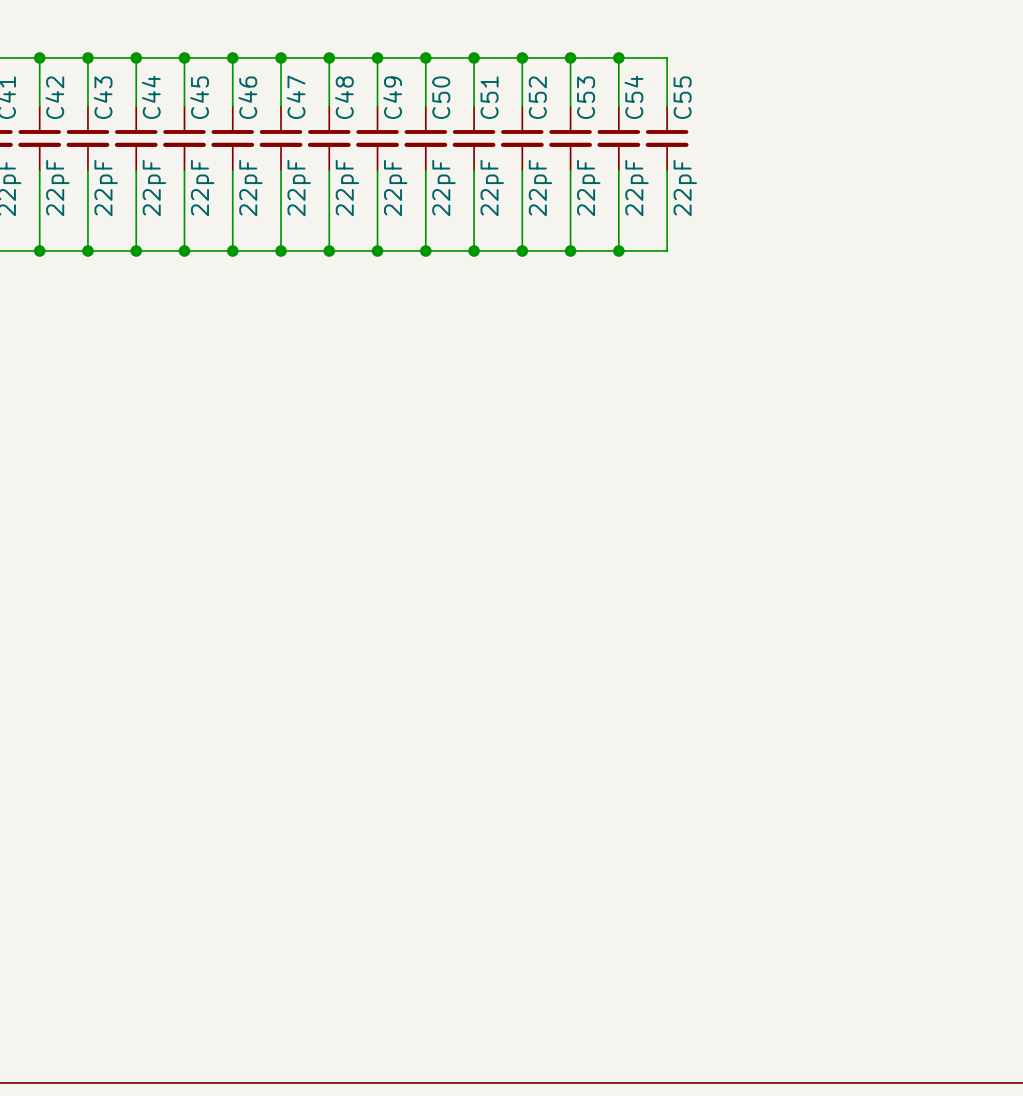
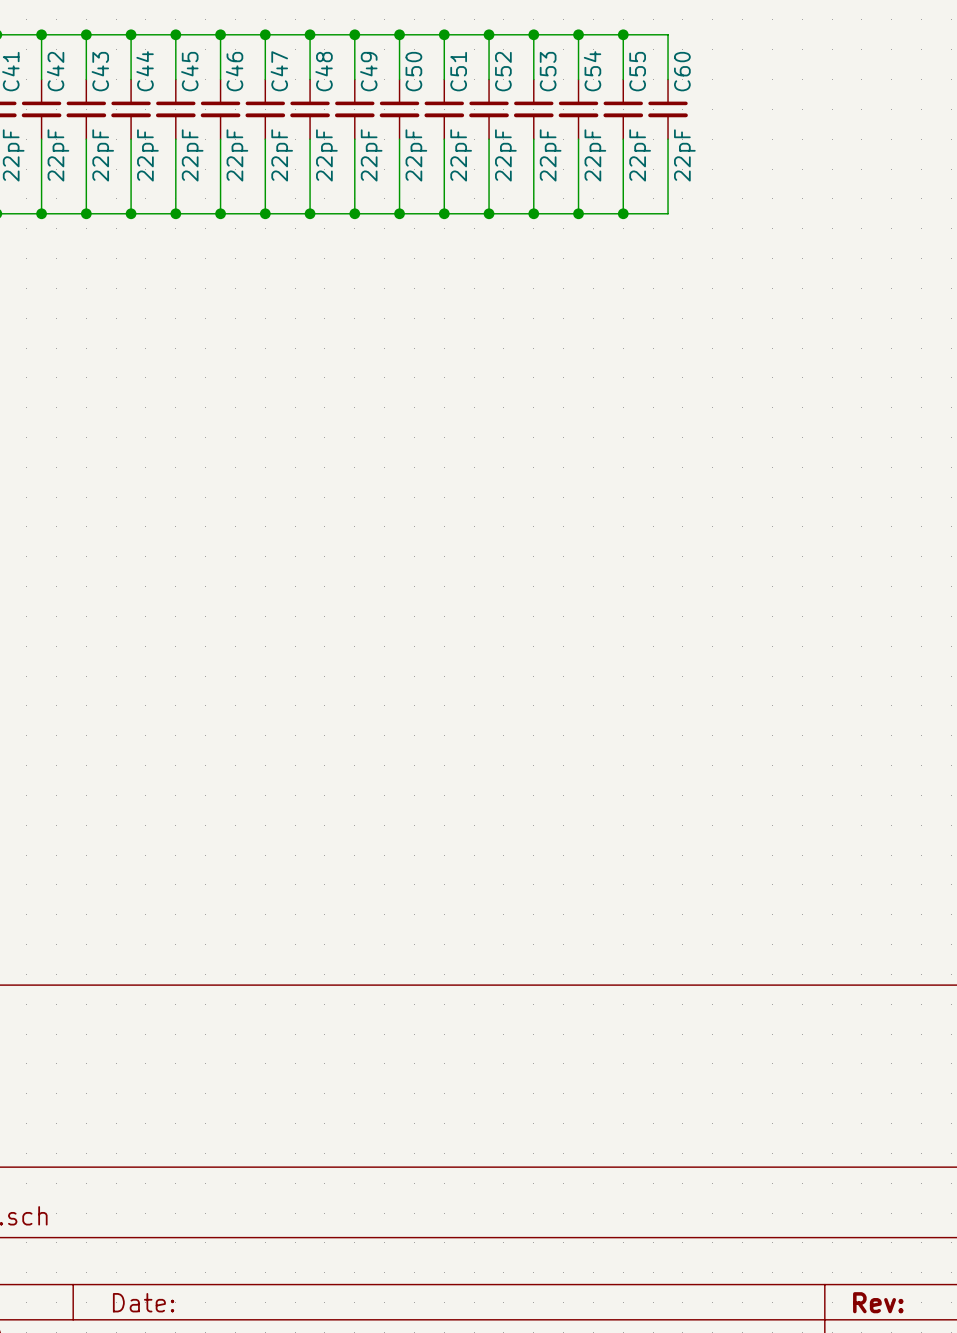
wire: none -> (623, 34) (668, 34) (668, 79)
junction: none -> (623, 34)
C60: none -> 22pF (668, 109)
wire: none -> (668, 139) (668, 213) (623, 213)
junction: none -> (623, 213)

